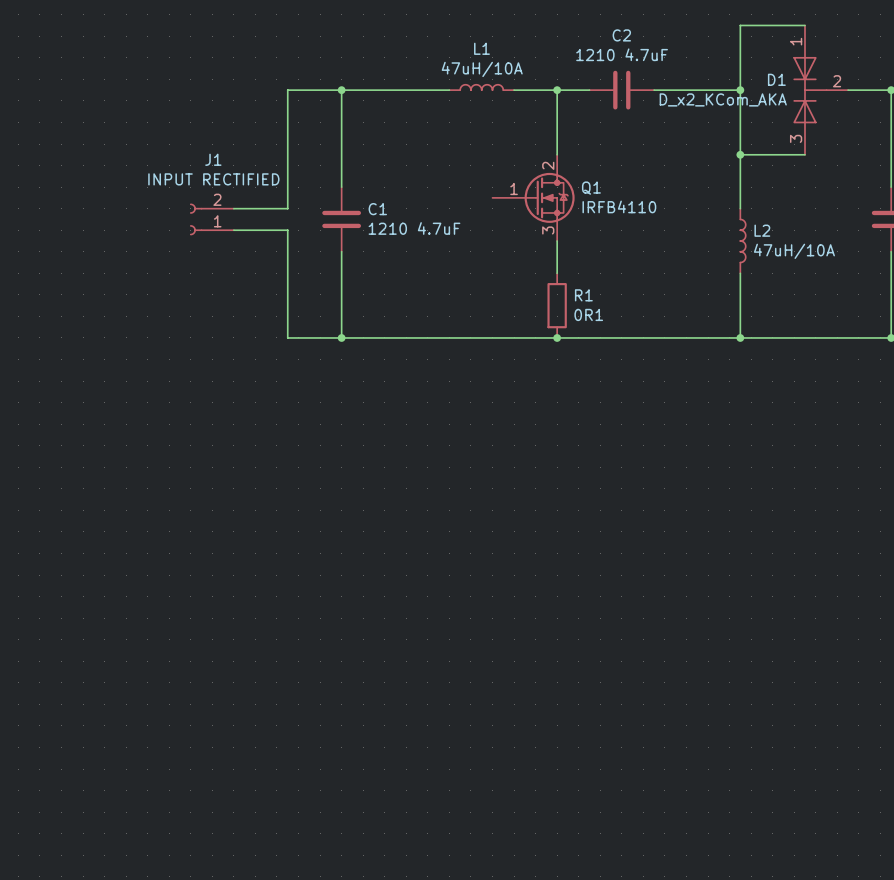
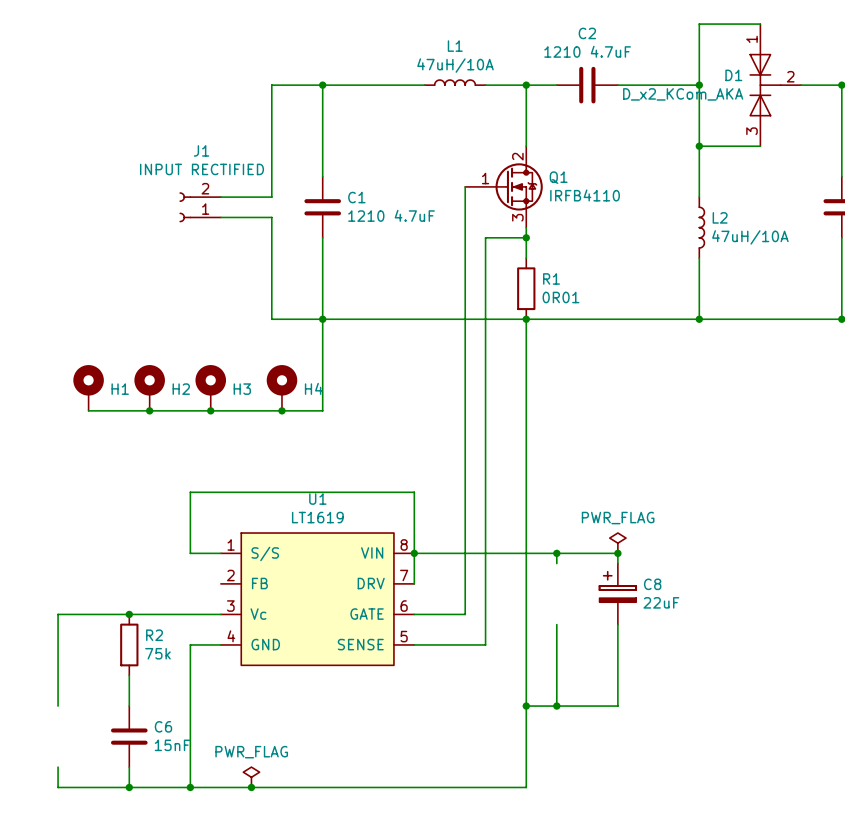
wire: none -> (465, 186) (465, 614) (414, 614)
wire: none -> (526, 237) (485, 237) (485, 644) (414, 644)
junction: none -> (526, 237)
R1 value: 0R1 (588, 314) -> 0R01 (560, 297)
wire: none -> (322, 319) (322, 410) (88, 410)
wire: none -> (526, 319) (526, 787) (58, 787) (58, 767)
H1: none -> (88, 387)
H2: none -> (149, 387)
H3: none -> (210, 387)
H4: none -> (281, 387)
junction: none -> (149, 410)
junction: none -> (210, 410)
junction: none -> (281, 410)
power symbol: none -> PWR_FLAG (617, 543)
wire: none -> (220, 553) (190, 553) (190, 492) (414, 492) (414, 583)
wire: none -> (414, 553) (617, 553) (617, 563)
junction: none -> (414, 553)
wire: none -> (556, 553) (556, 563)
junction: none -> (556, 553)
junction: none -> (617, 553)
C8: none -> 22uF (617, 594)
U1: none -> LT1619 (317, 599)
junction: none -> (129, 614)
wire: none -> (220, 614) (58, 614) (58, 706)
wire: none -> (556, 624) (556, 706)
wire: none -> (617, 624) (617, 706) (526, 706)
R2: none -> 75k (129, 644)
wire: none -> (220, 644) (190, 644) (190, 787)
wire: none -> (129, 675) (129, 706)
junction: none -> (526, 706)
junction: none -> (556, 706)
C6: none -> 15nF (129, 736)
wire: none -> (129, 767) (129, 787)
power symbol: none -> PWR_FLAG (251, 777)
junction: none -> (129, 787)
junction: none -> (190, 787)
junction: none -> (251, 787)

